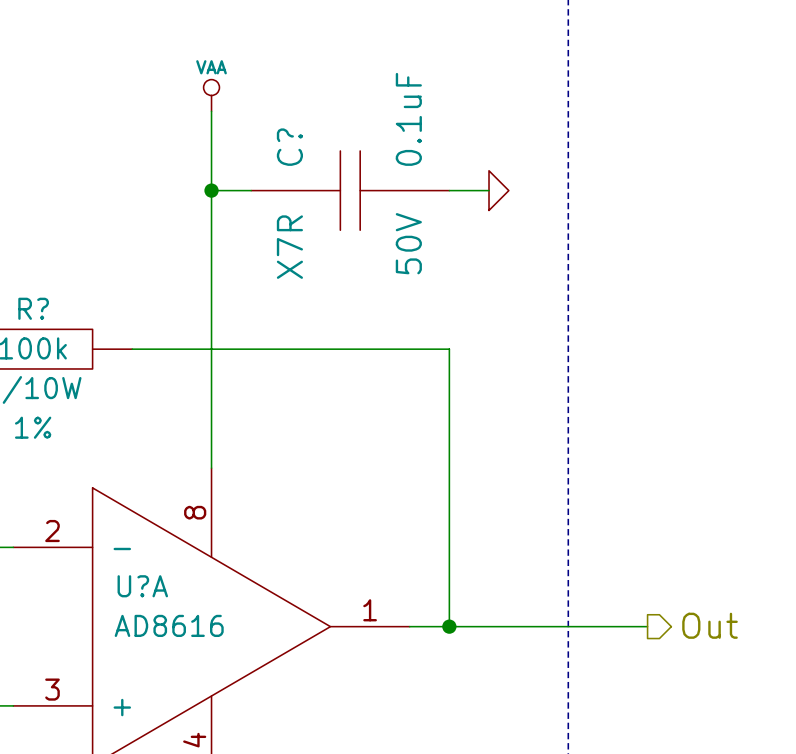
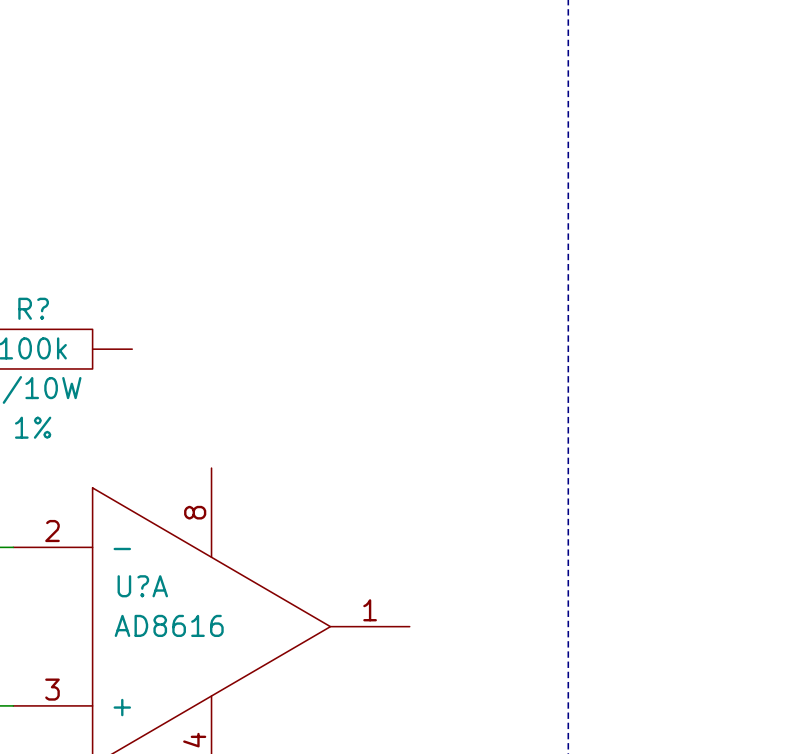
power symbol: VAA (211, 95) -> none
wire: (211, 111) (211, 468) -> none
wire: (211, 190) (251, 190) -> none
junction: (211, 190) -> none
C?: 0.1uF (350, 190) -> none
wire: (449, 190) (489, 190) -> none
power symbol: (498, 190) -> none
wire: (132, 349) (449, 349) (449, 626) -> none
hierarchical label: Out (710, 625) -> none
wire: (409, 626) (647, 626) -> none
junction: (449, 626) -> none

